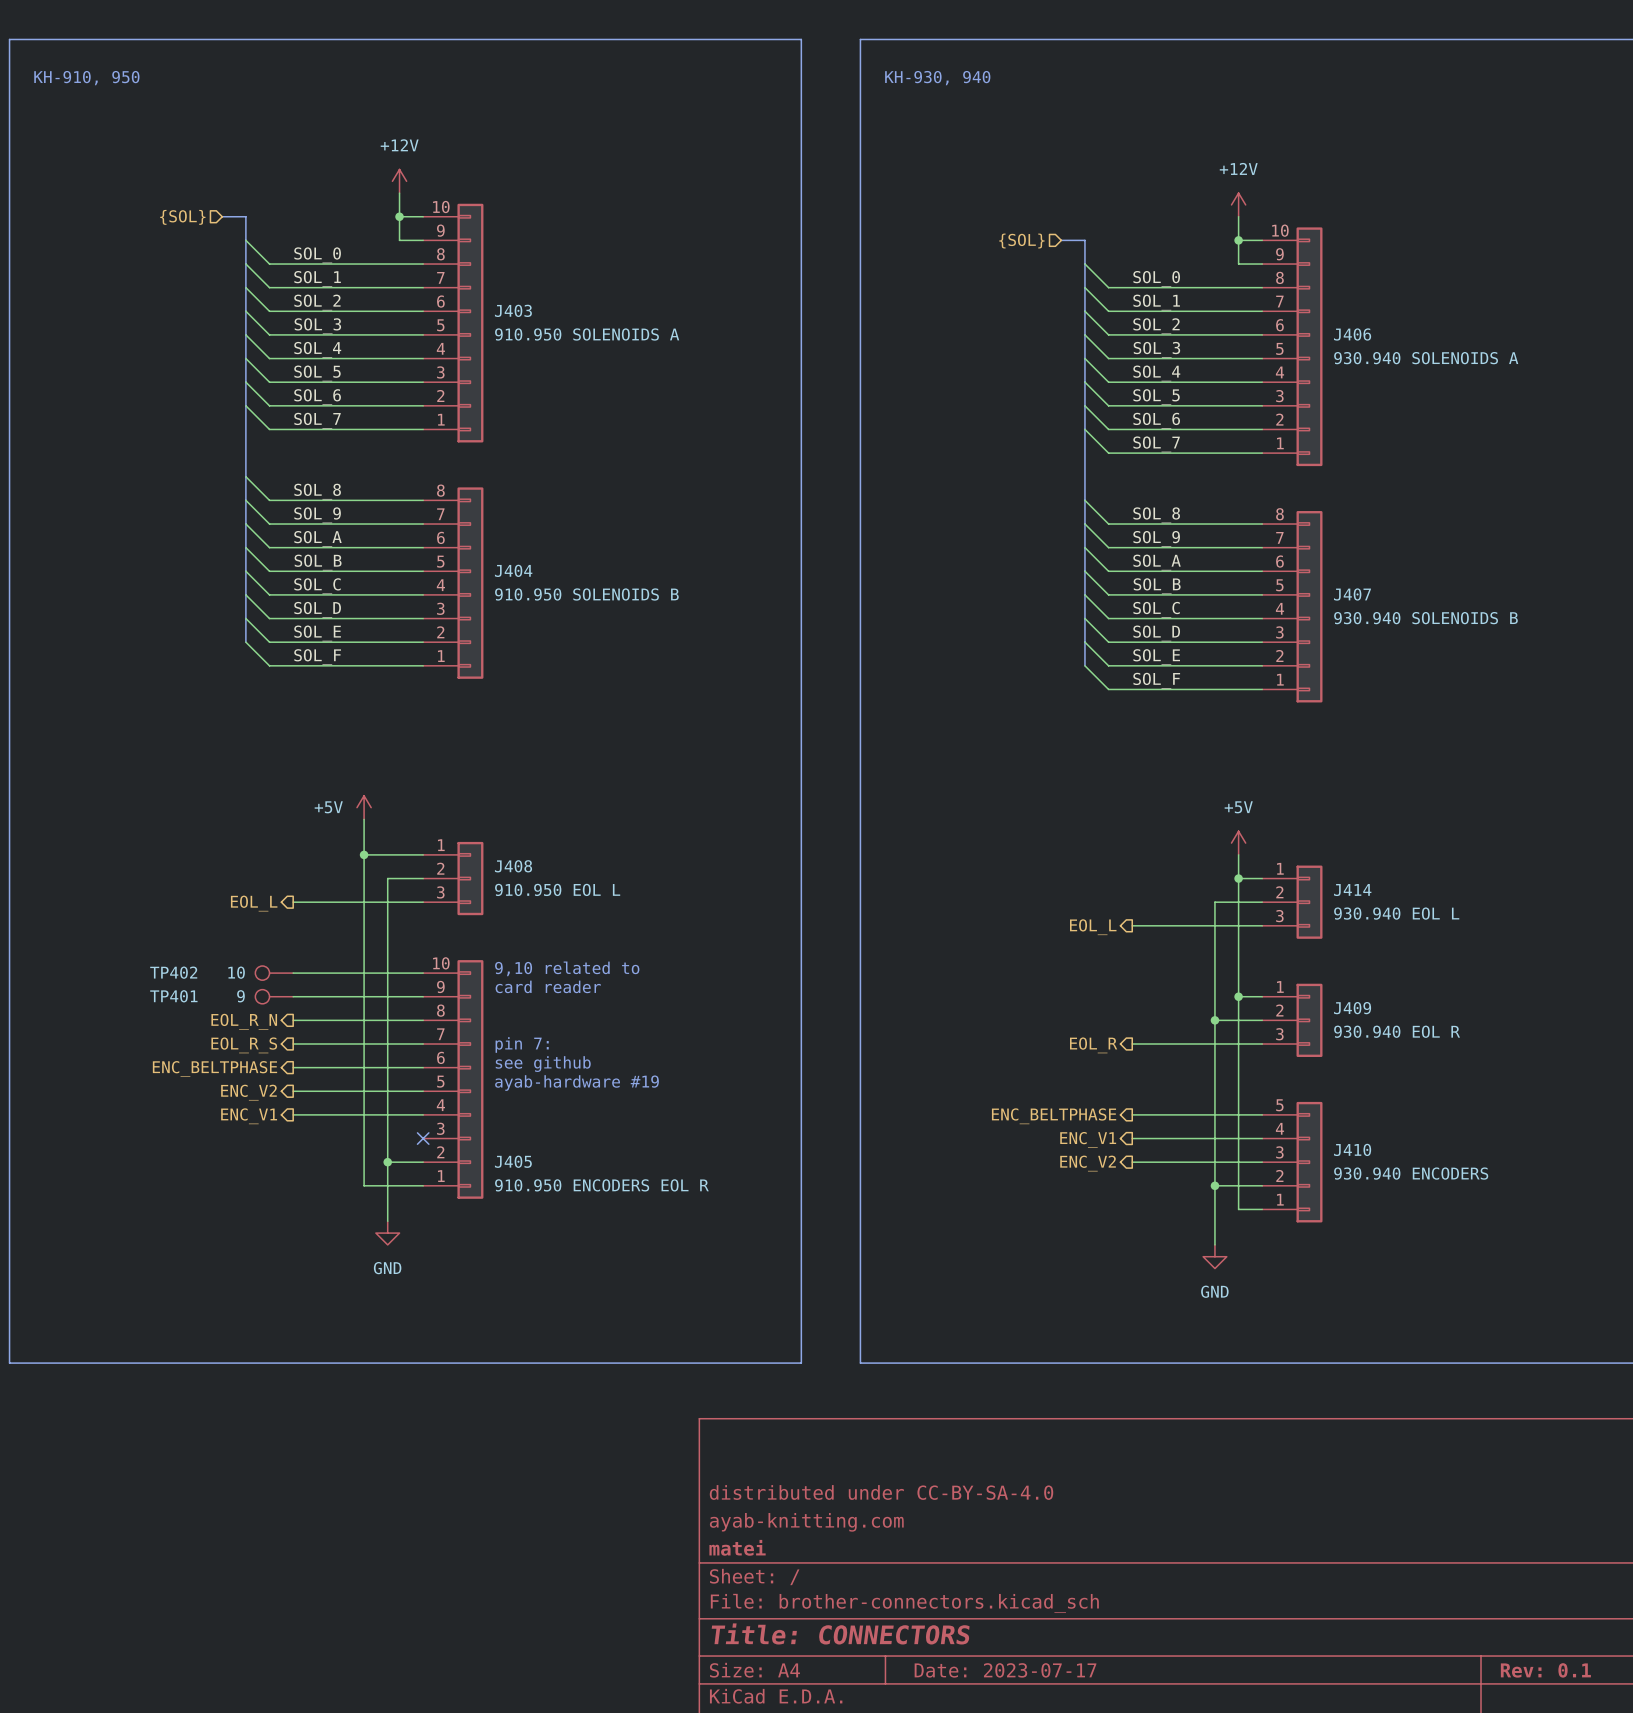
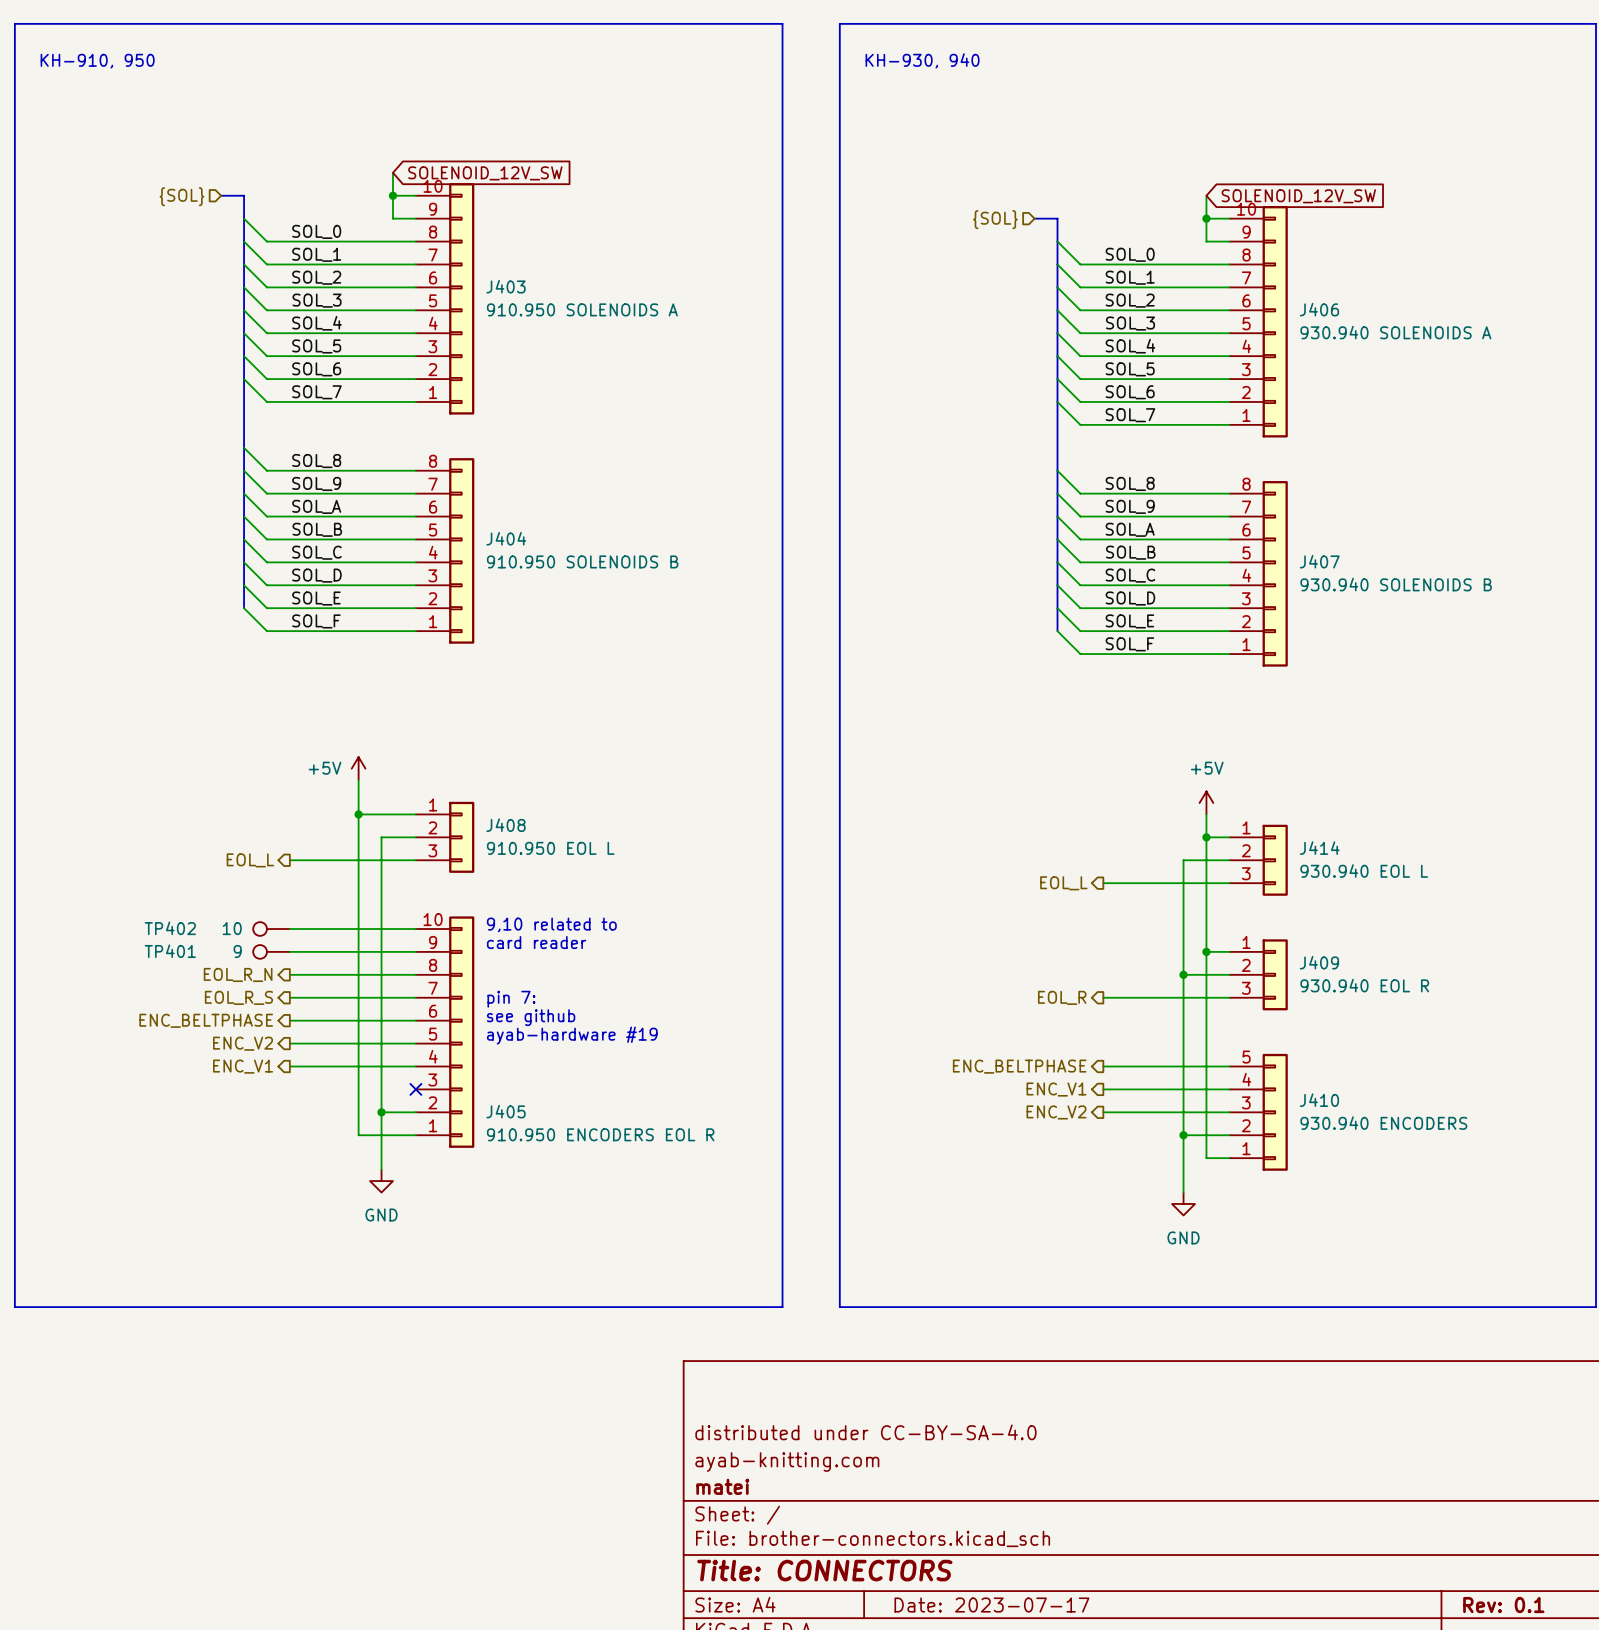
power symbol: +12V (399, 181) -> none
global label: none -> SOLENOID_12V_SW (485, 173)
power symbol: +12V (1238, 204) -> none
global label: none -> SOLENOID_12V_SW (1298, 196)

